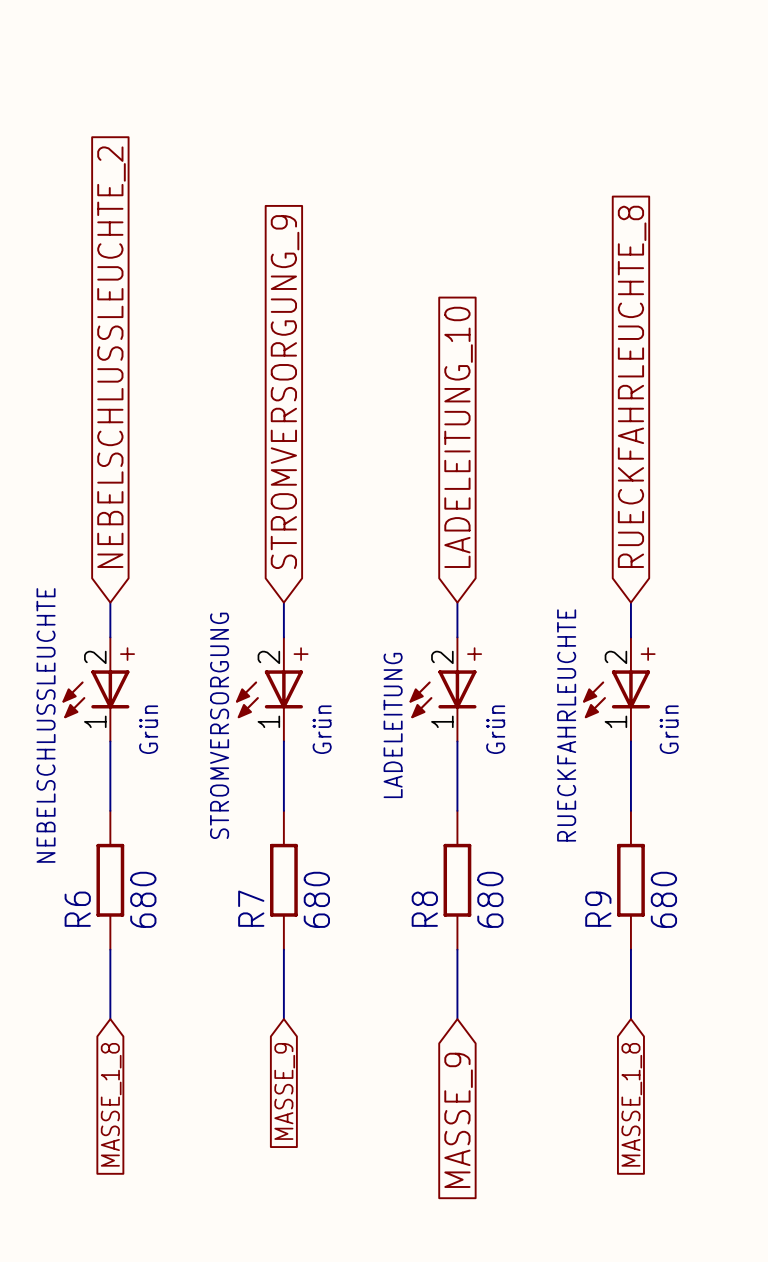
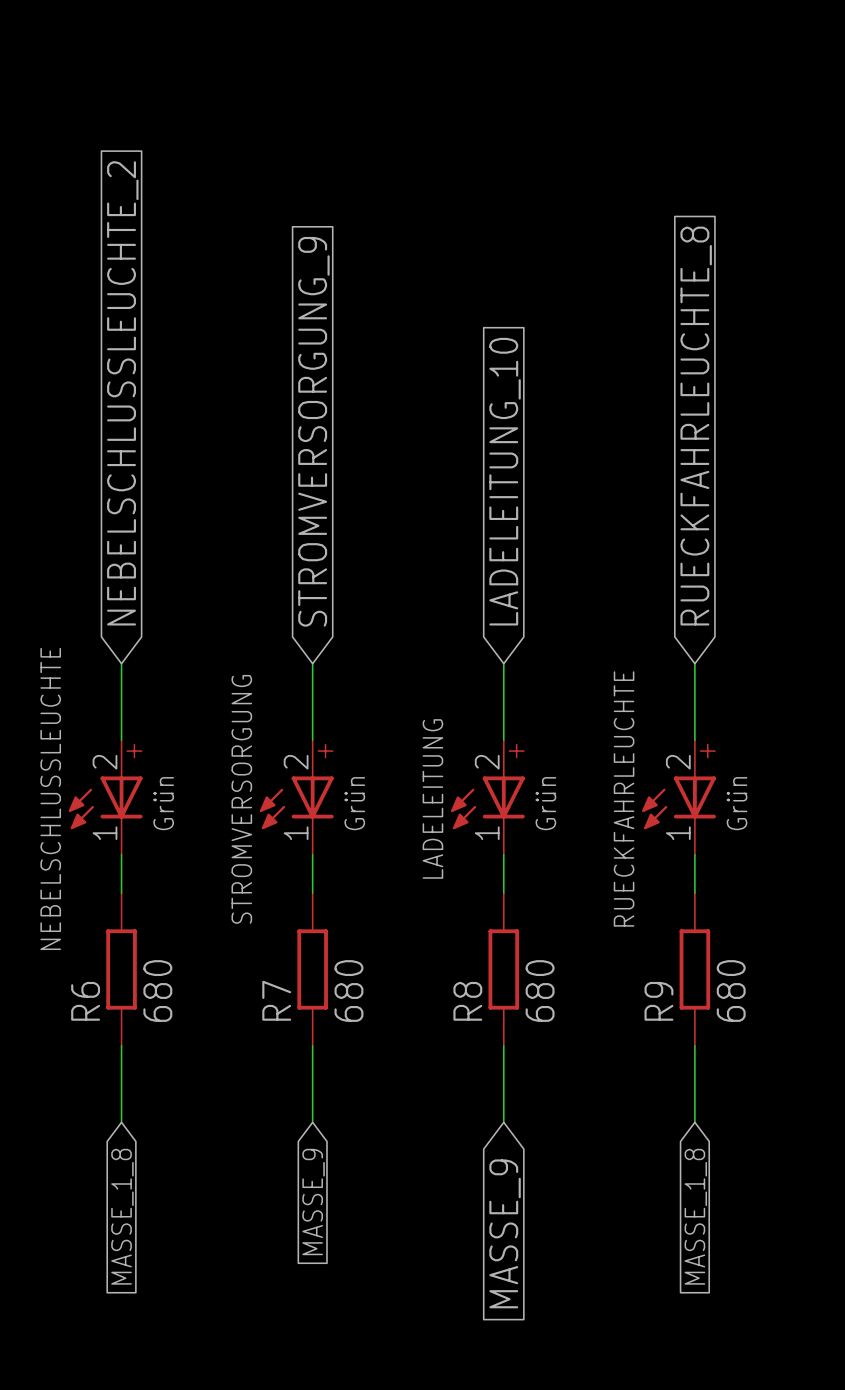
NEBELSCHLUSSLEUCHTE: Grün (95, 689) -> none
STROMVERSORGUNG: Grün (269, 689) -> none
LADELEITUNG: Grün (443, 689) -> none
RUECKFAHRLEUCHTE: Grün (616, 689) -> none
NEBELSCHLUSSLEUCHTE: none -> Grün (105, 797)
STROMVERSORGUNG: none -> Grün (296, 797)
LADELEITUNG: none -> Grün (487, 797)
RUECKFAHRLEUCHTE: none -> Grün (679, 797)

